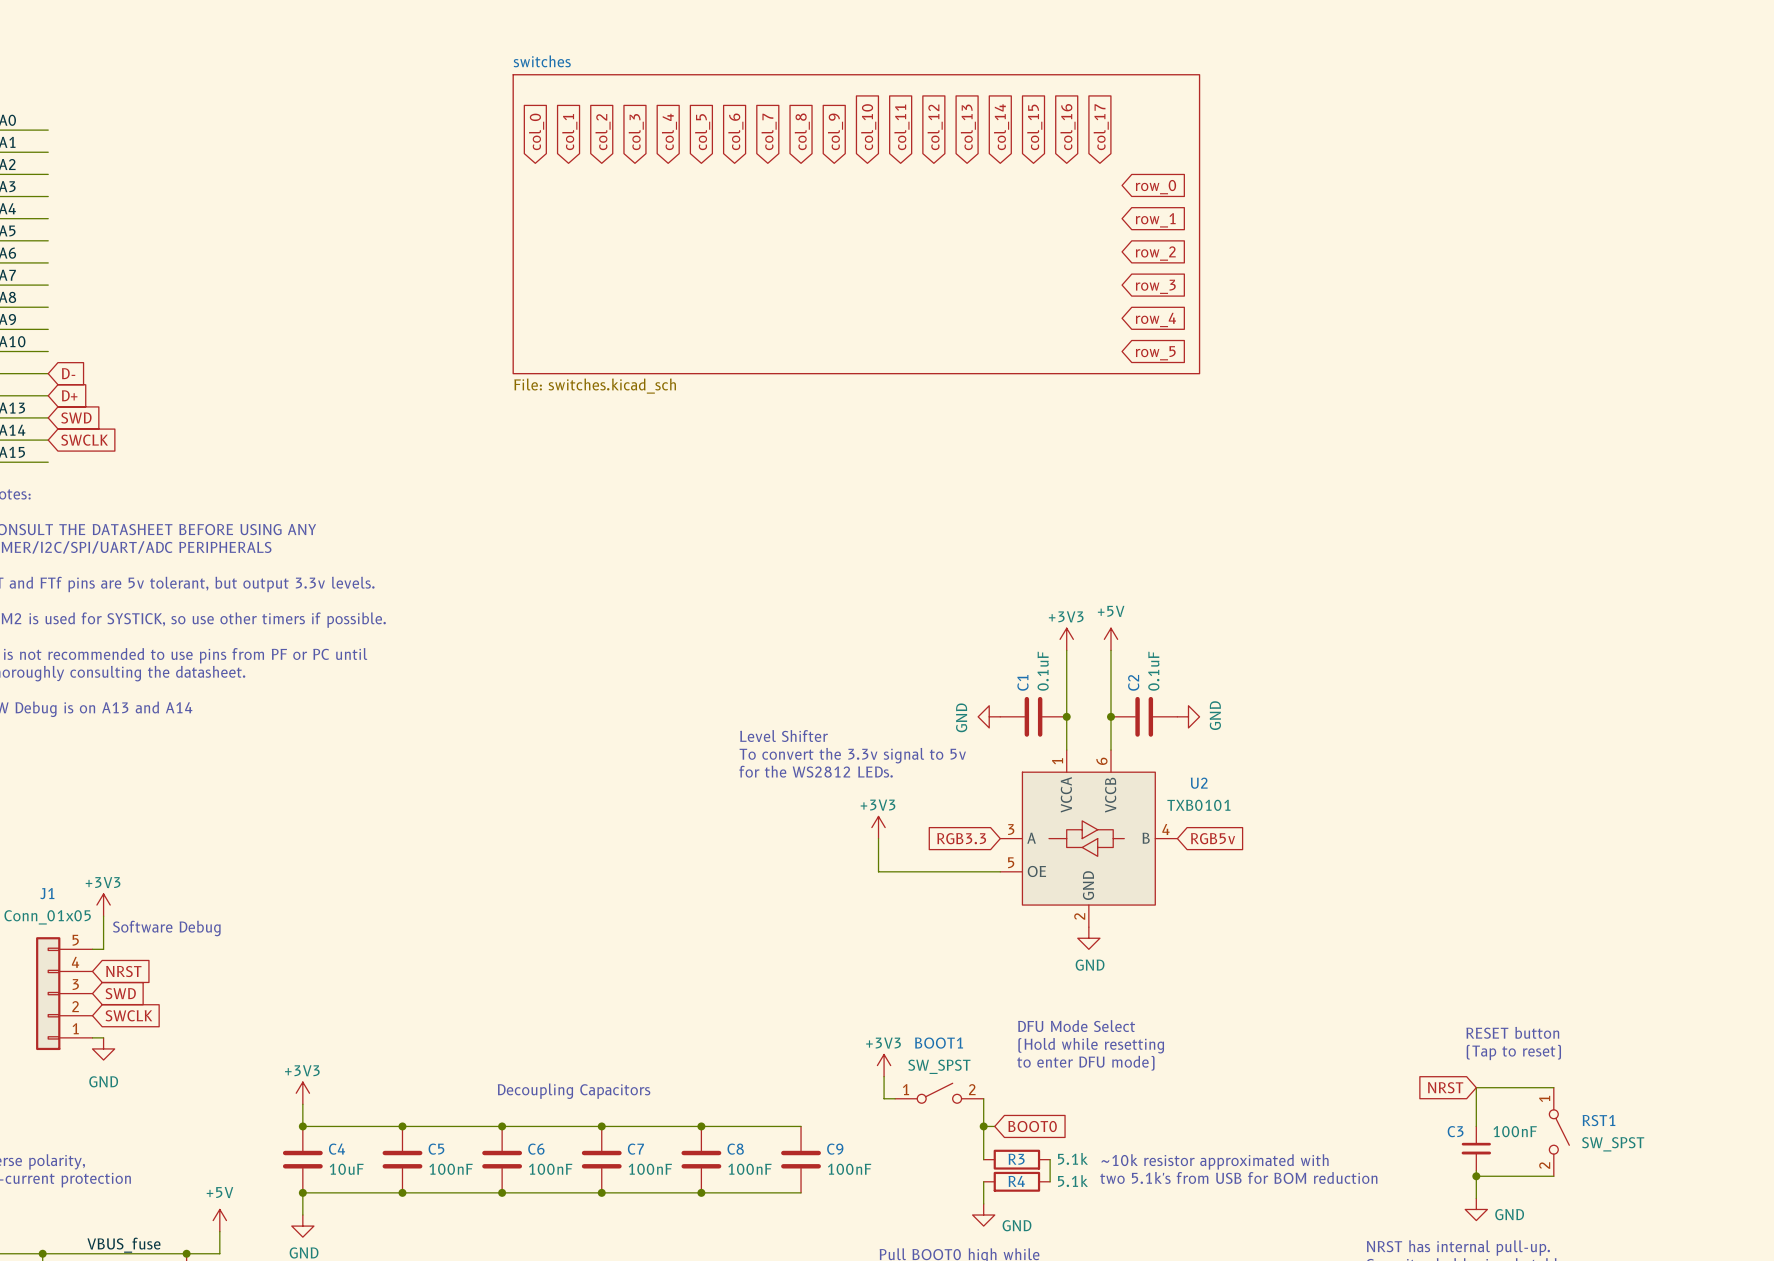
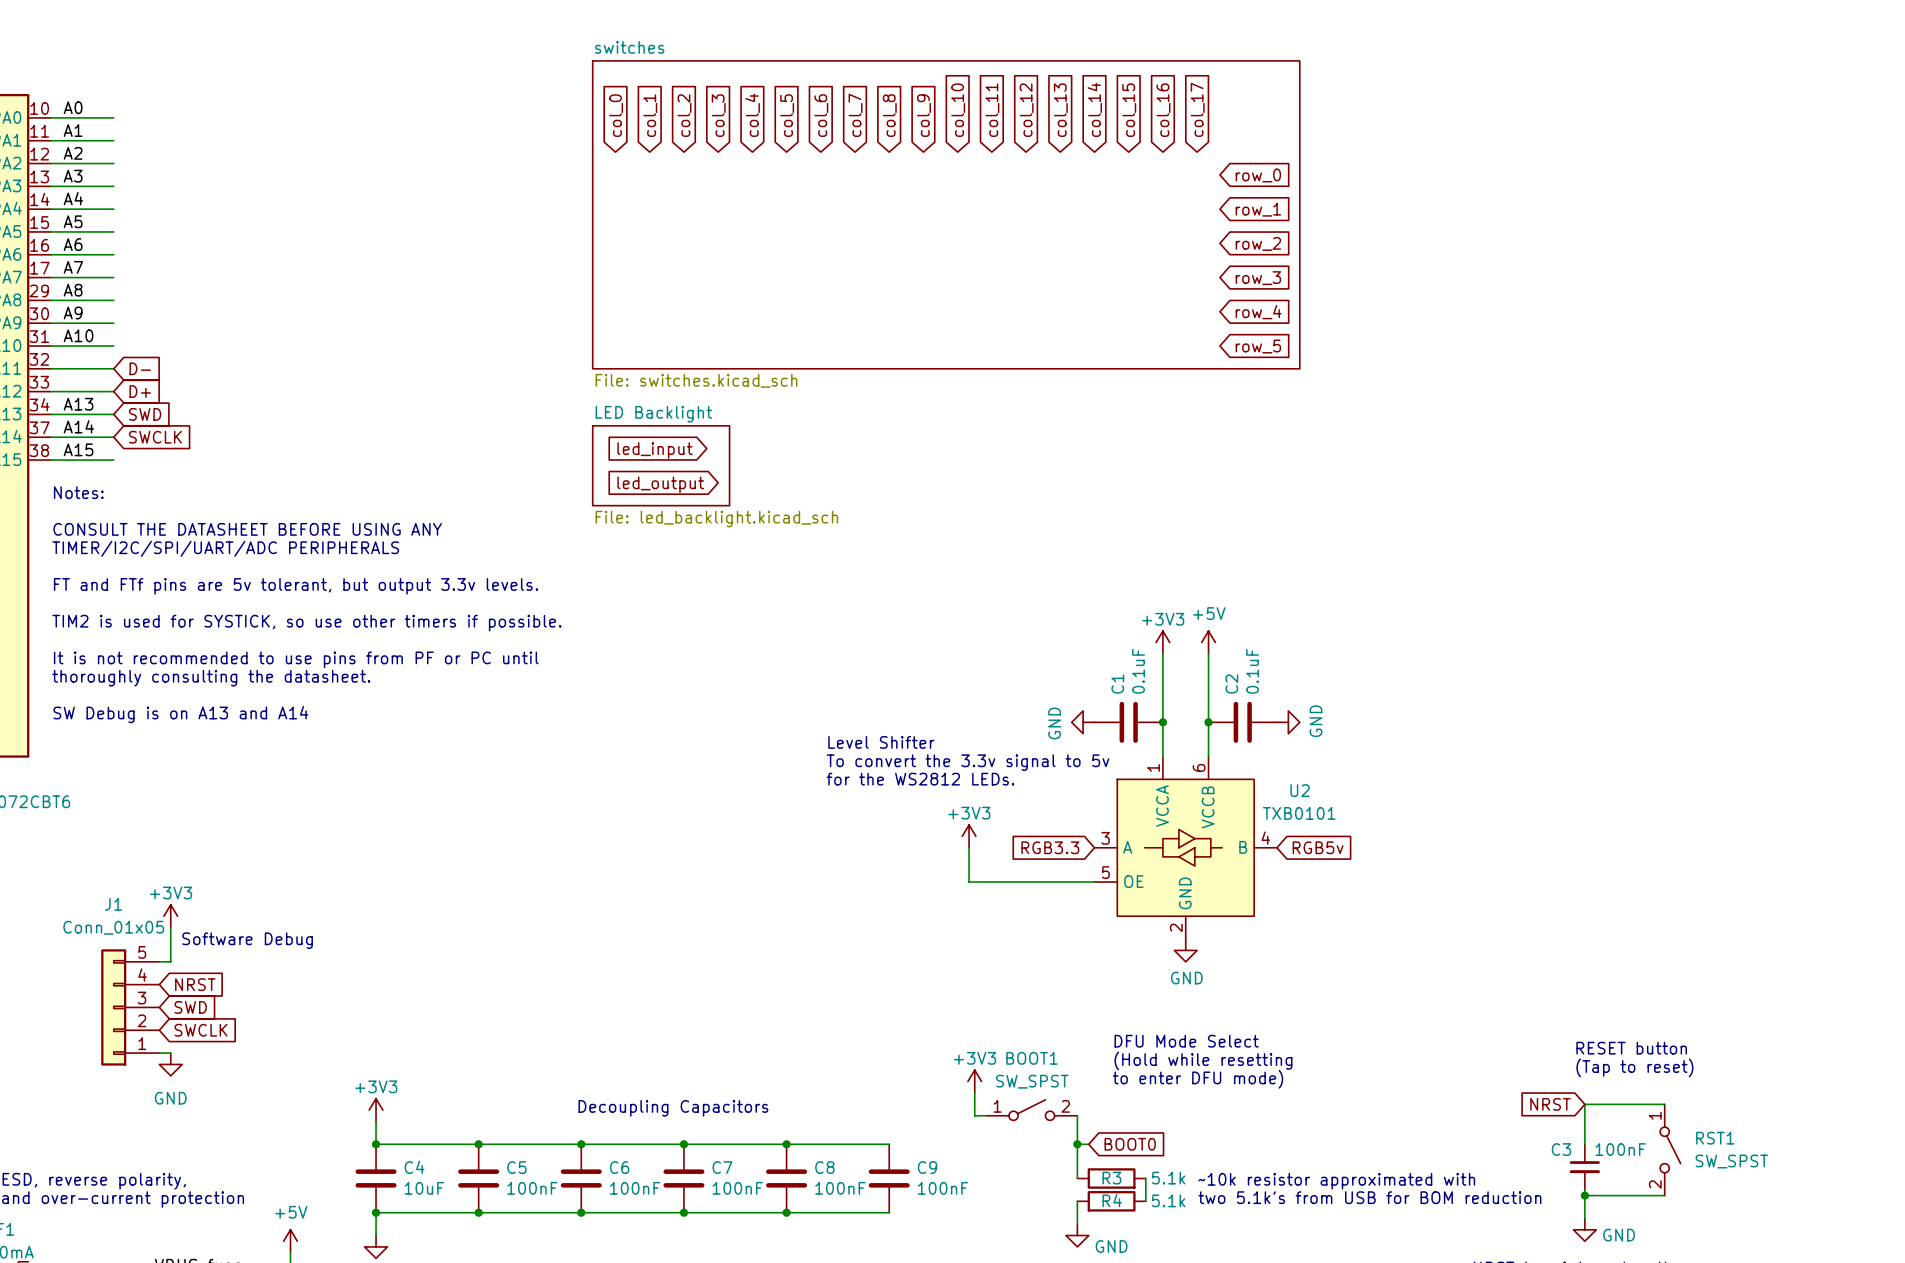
global label: none -> led_input (655, 450)
sheet LED Backlight: none -> File: led_backlight.kicad_sch (661, 465)
global label: none -> led_output (660, 484)

